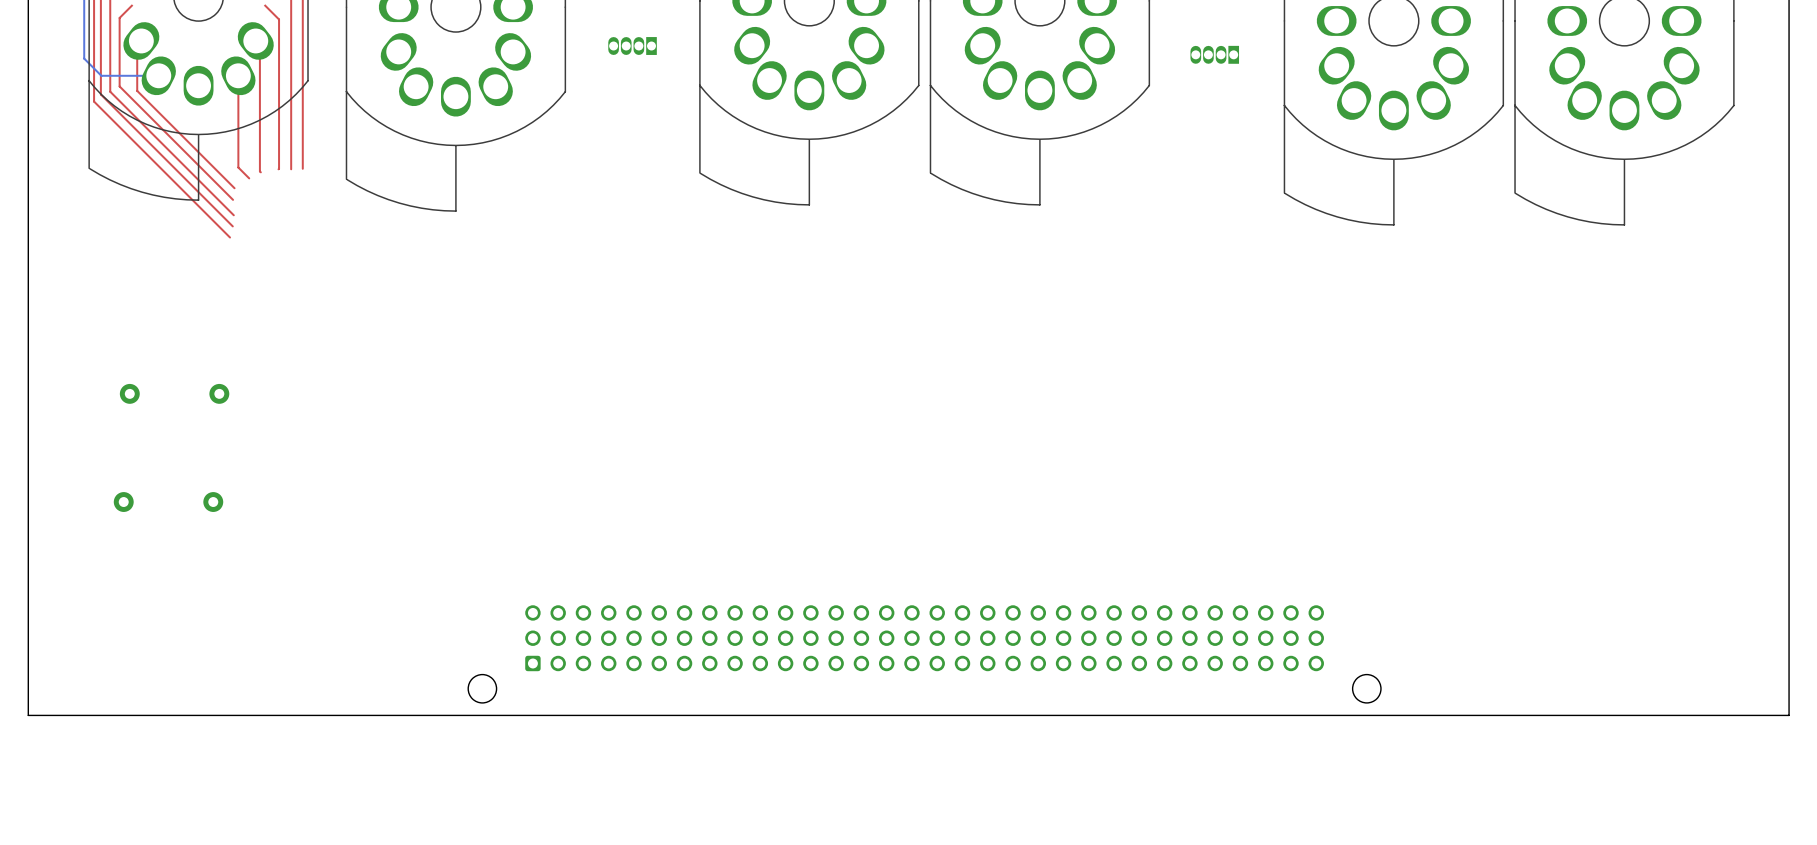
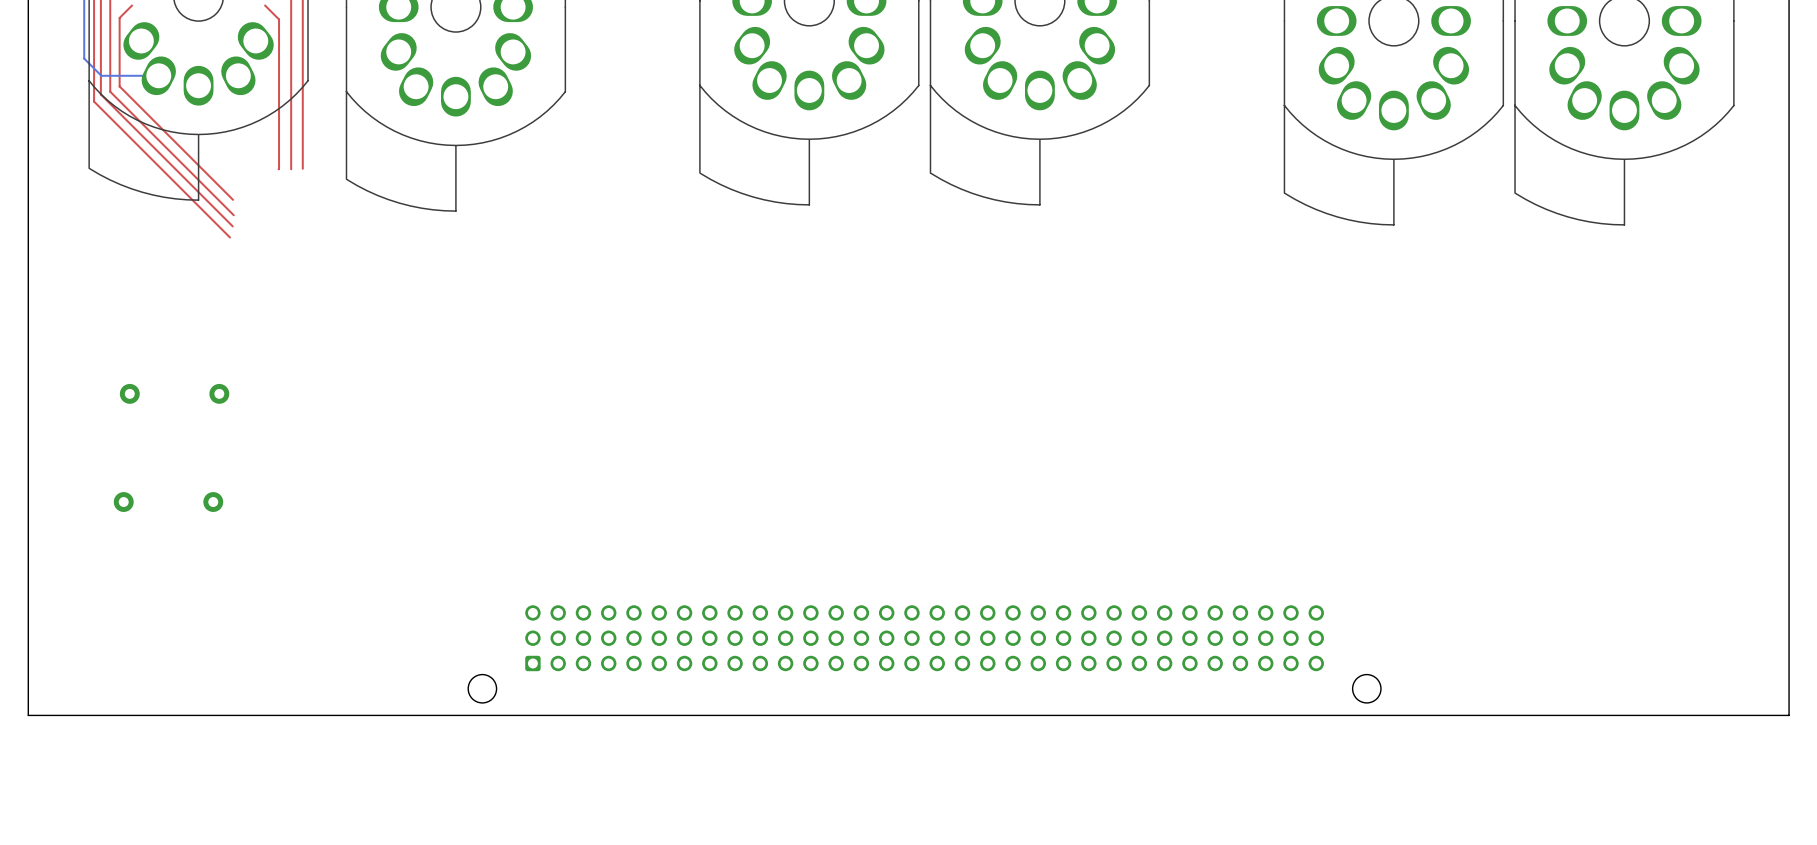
top track: (255, 40) (259, 45) (260, 172) -> none
top track: (143, 46) (141, 40) (137, 45) (137, 90) (234, 188) -> none
part: (632, 46) -> none
part: (1214, 54) -> none
top track: (238, 75) (238, 167) (249, 178) -> none

